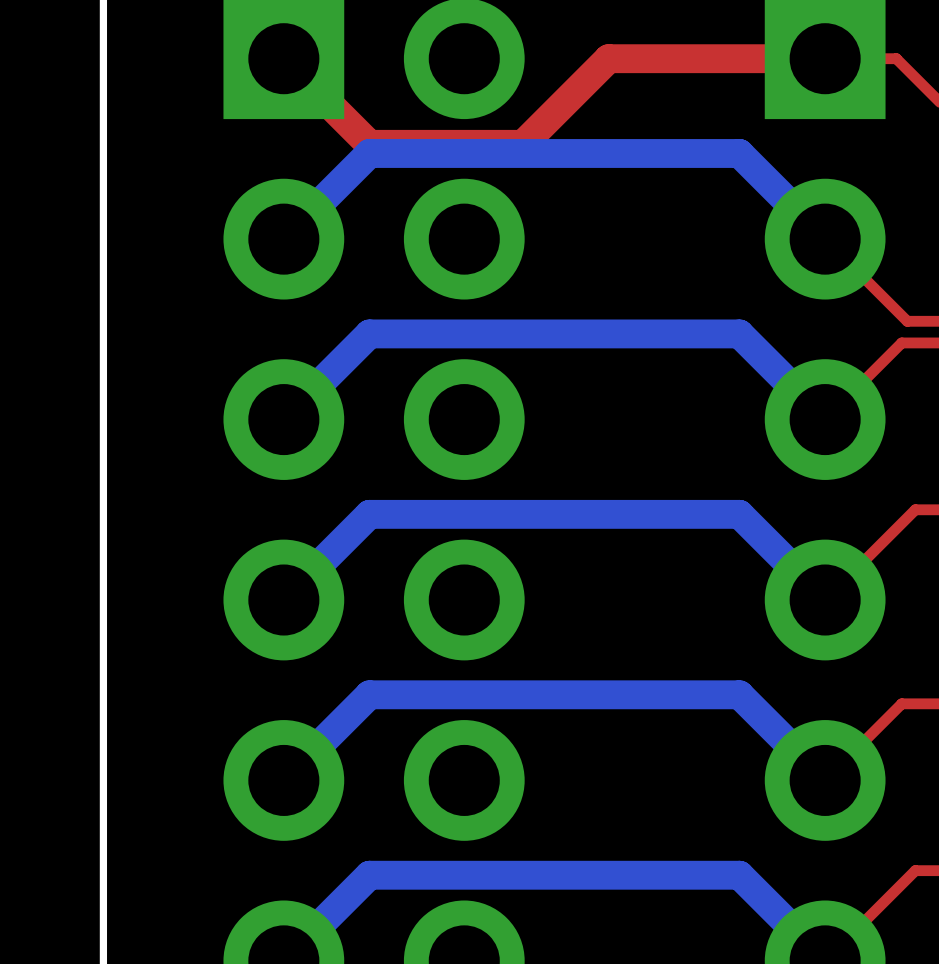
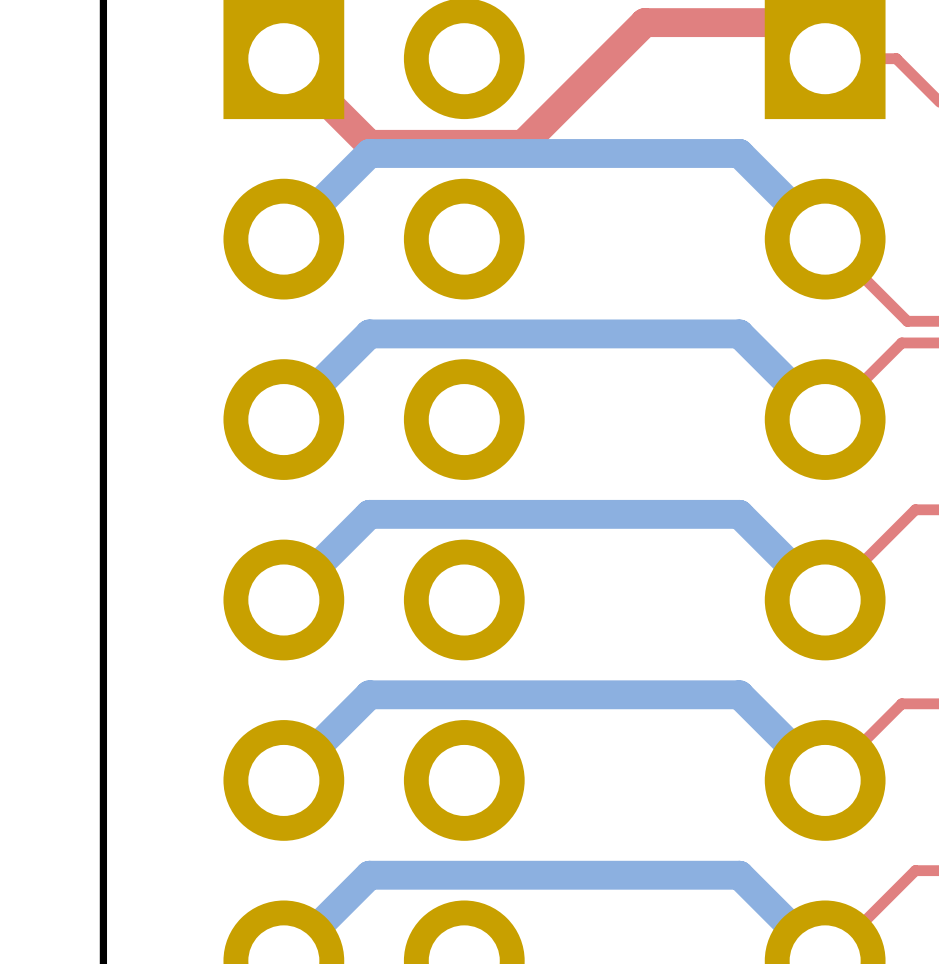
top track: (825, 58) (608, 58) -> (825, 58) (789, 22) (644, 22) (608, 58)

